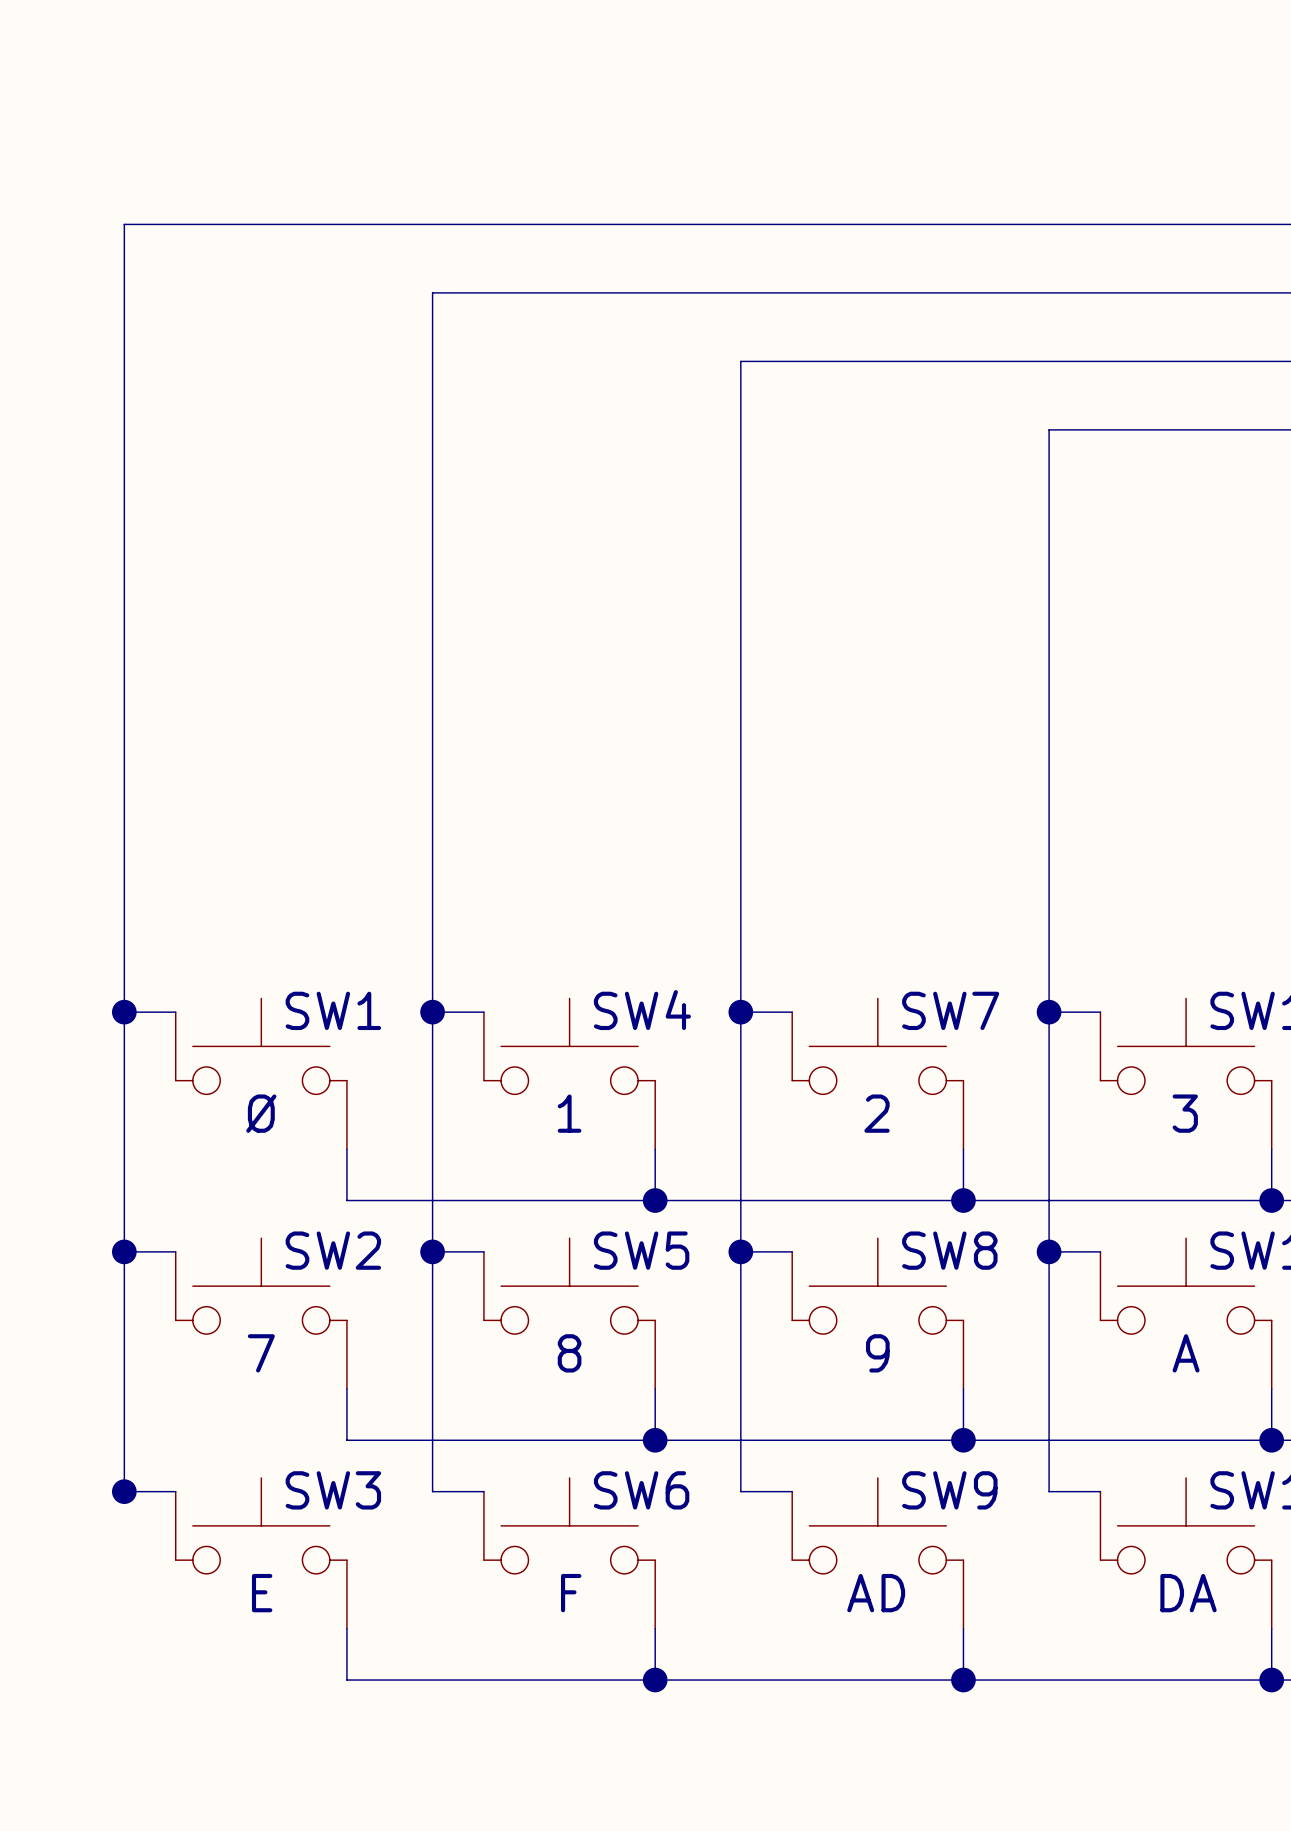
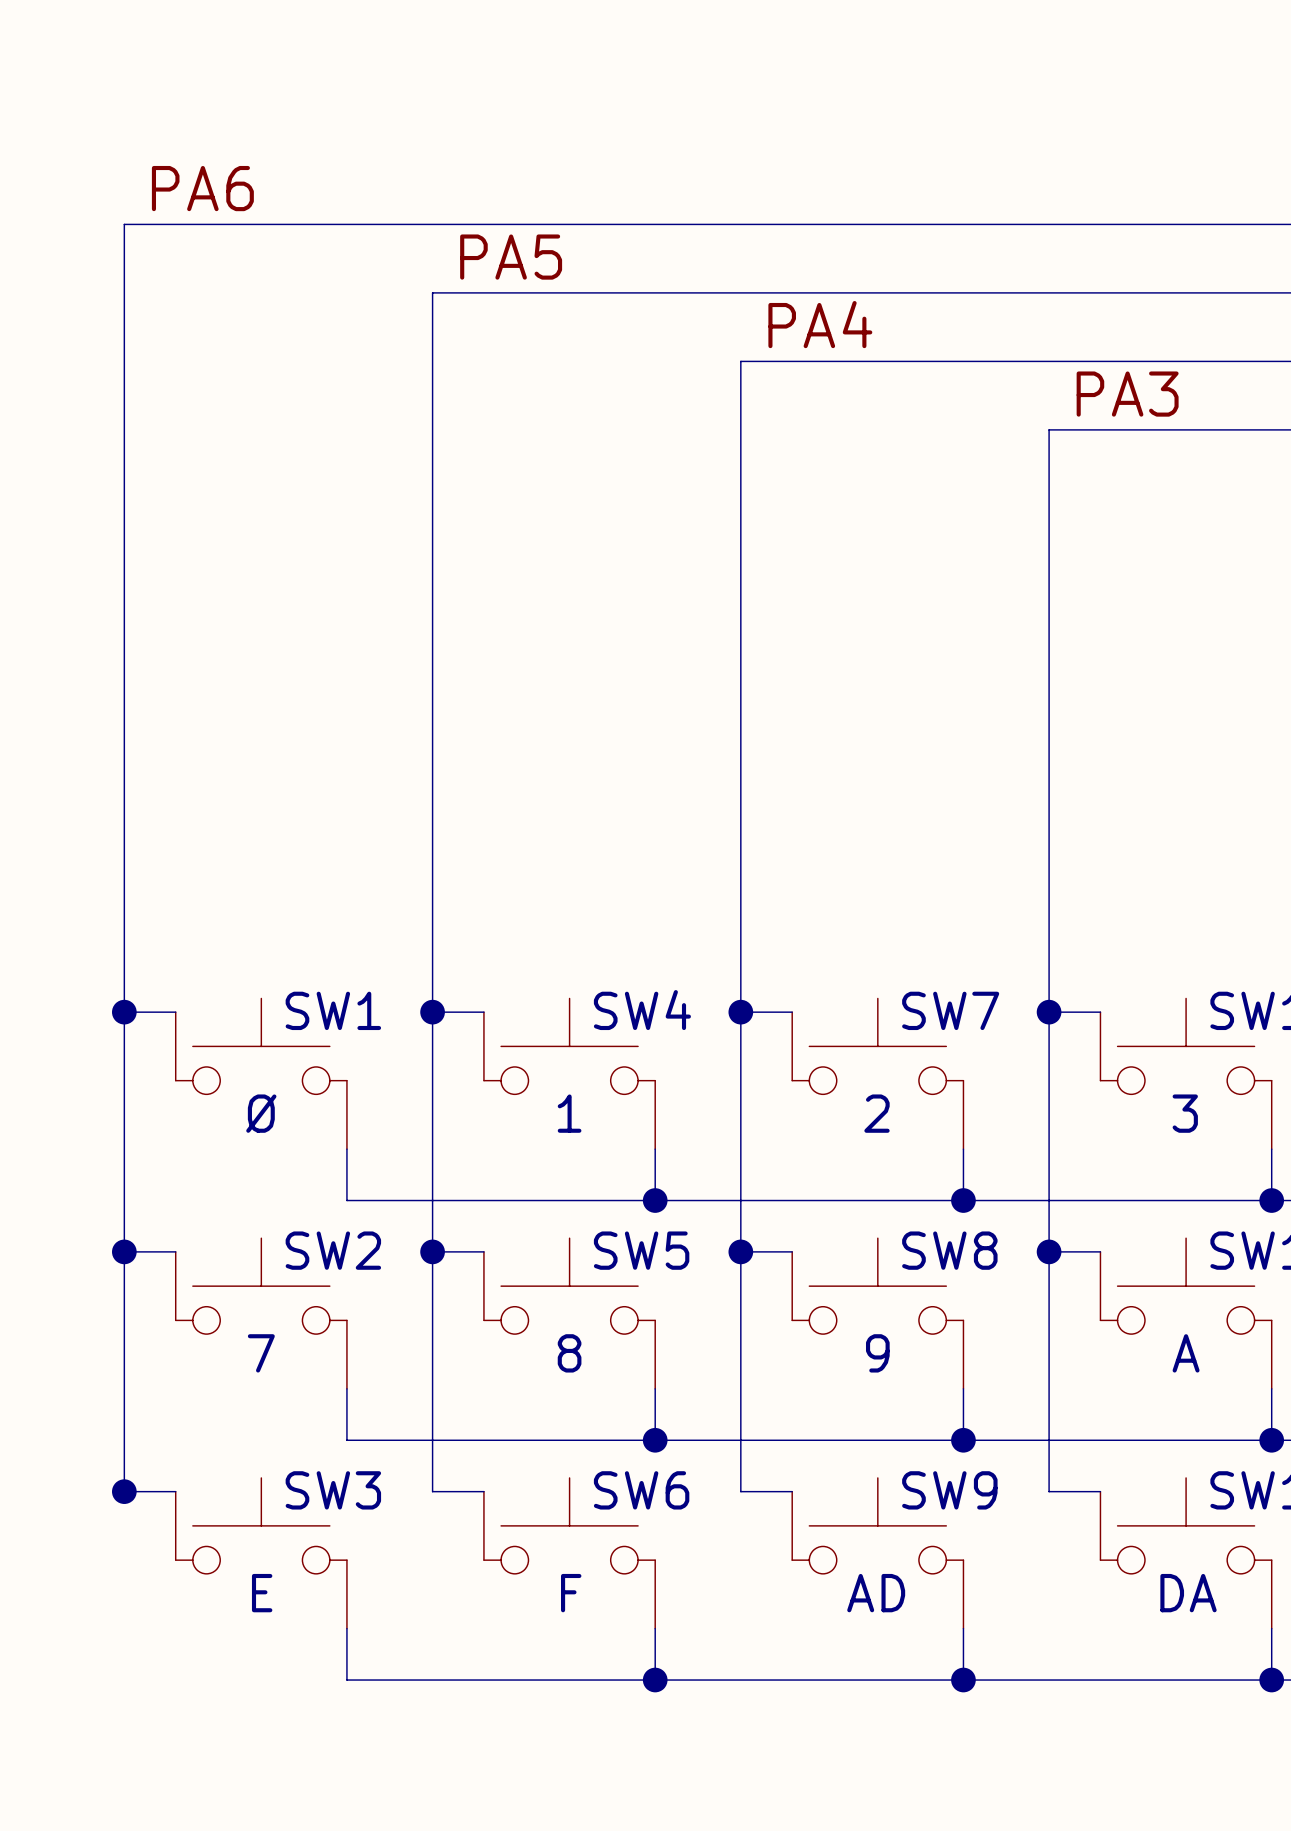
label: none -> PA6 (202, 188)
label: none -> PA5 (511, 257)
label: none -> PA4 (820, 324)
label: none -> PA3 (1127, 394)

